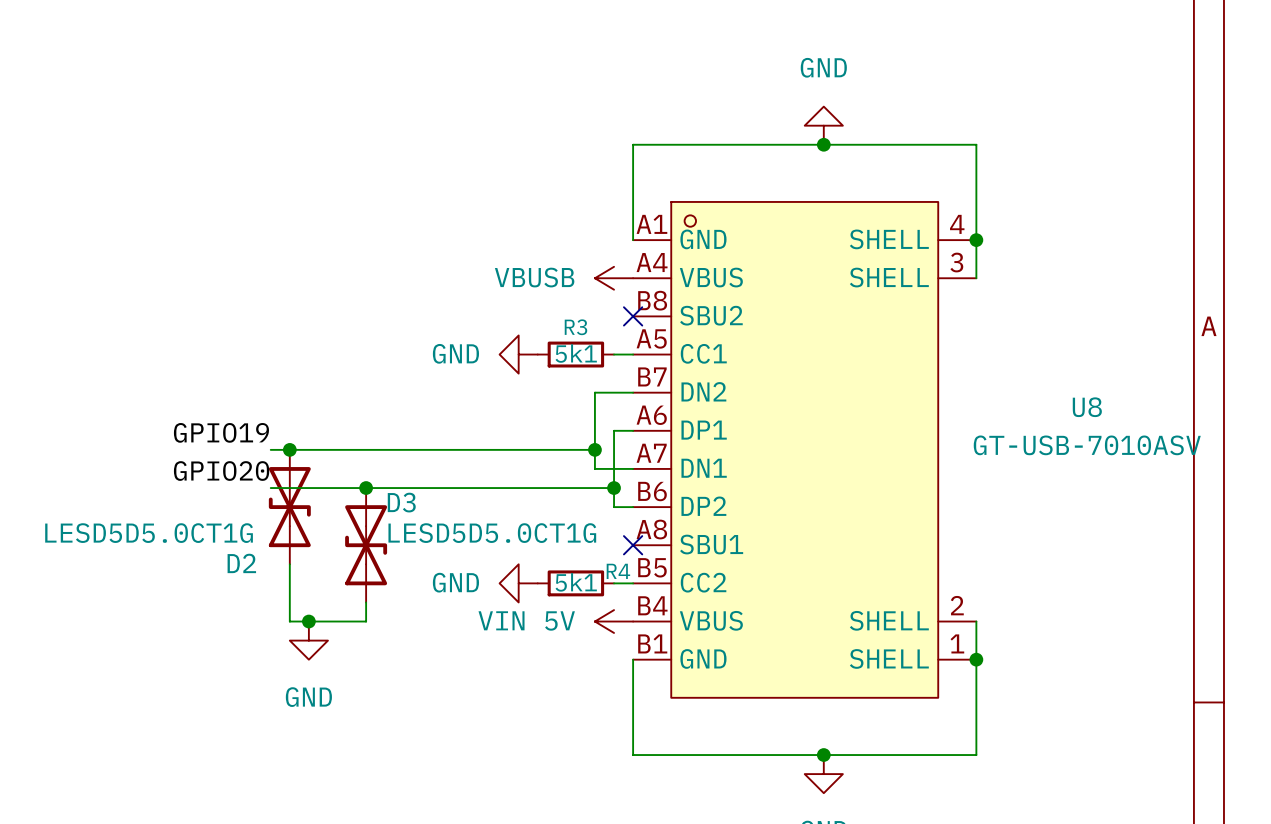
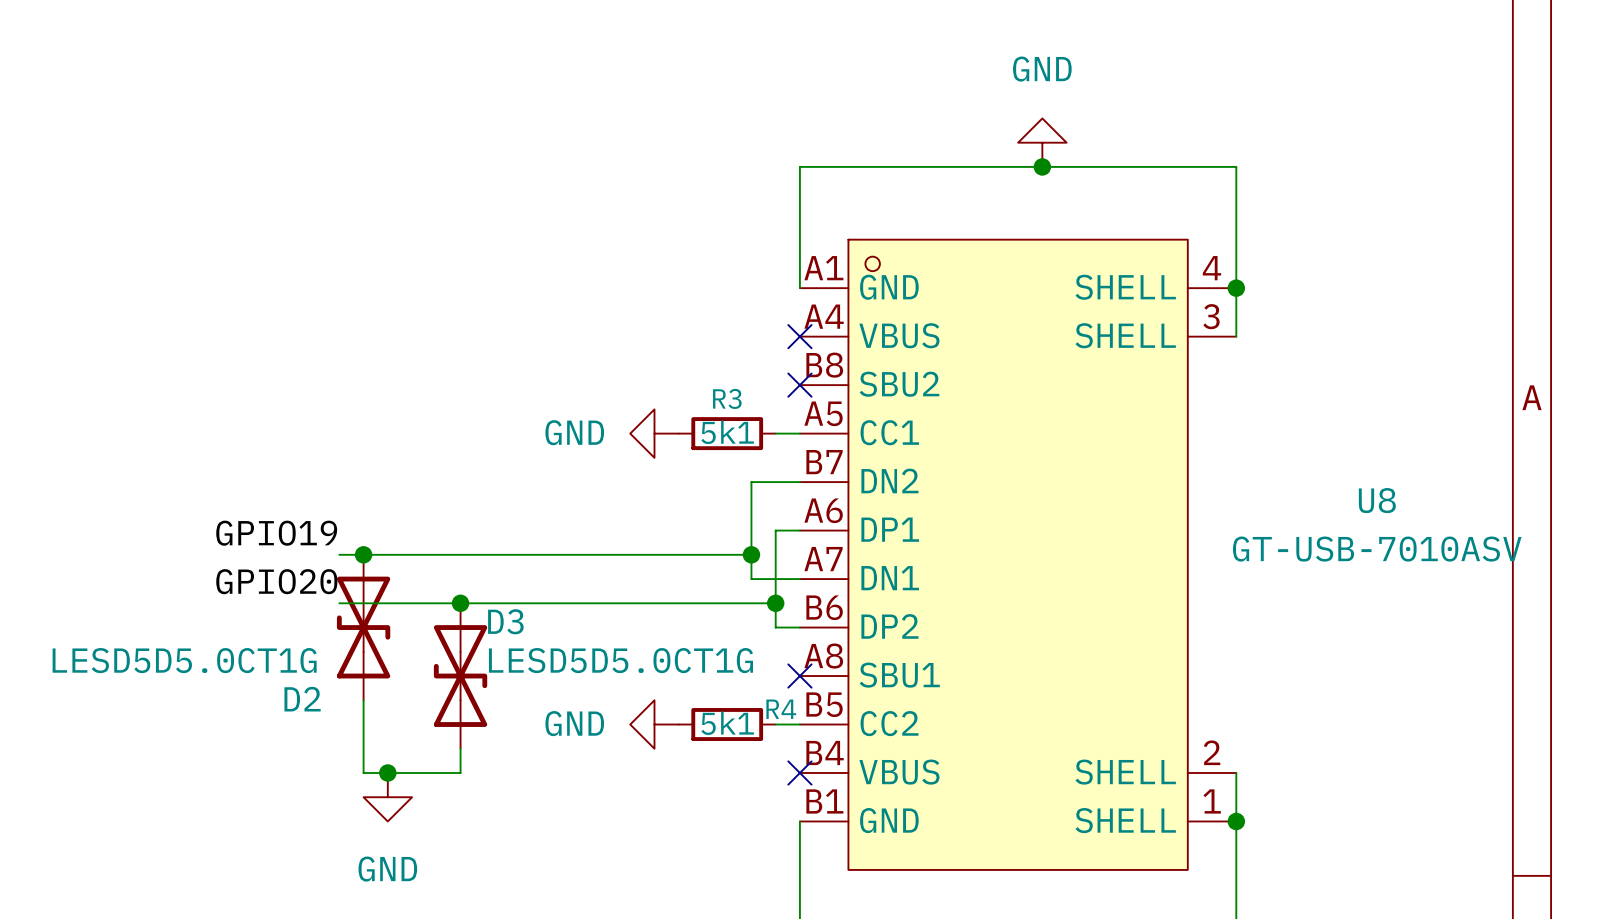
power symbol: VBUSB (614, 278) -> none
no-connect mark: none -> (799, 336)
power symbol: VIN 5V (614, 621) -> none
no-connect mark: none -> (799, 772)

